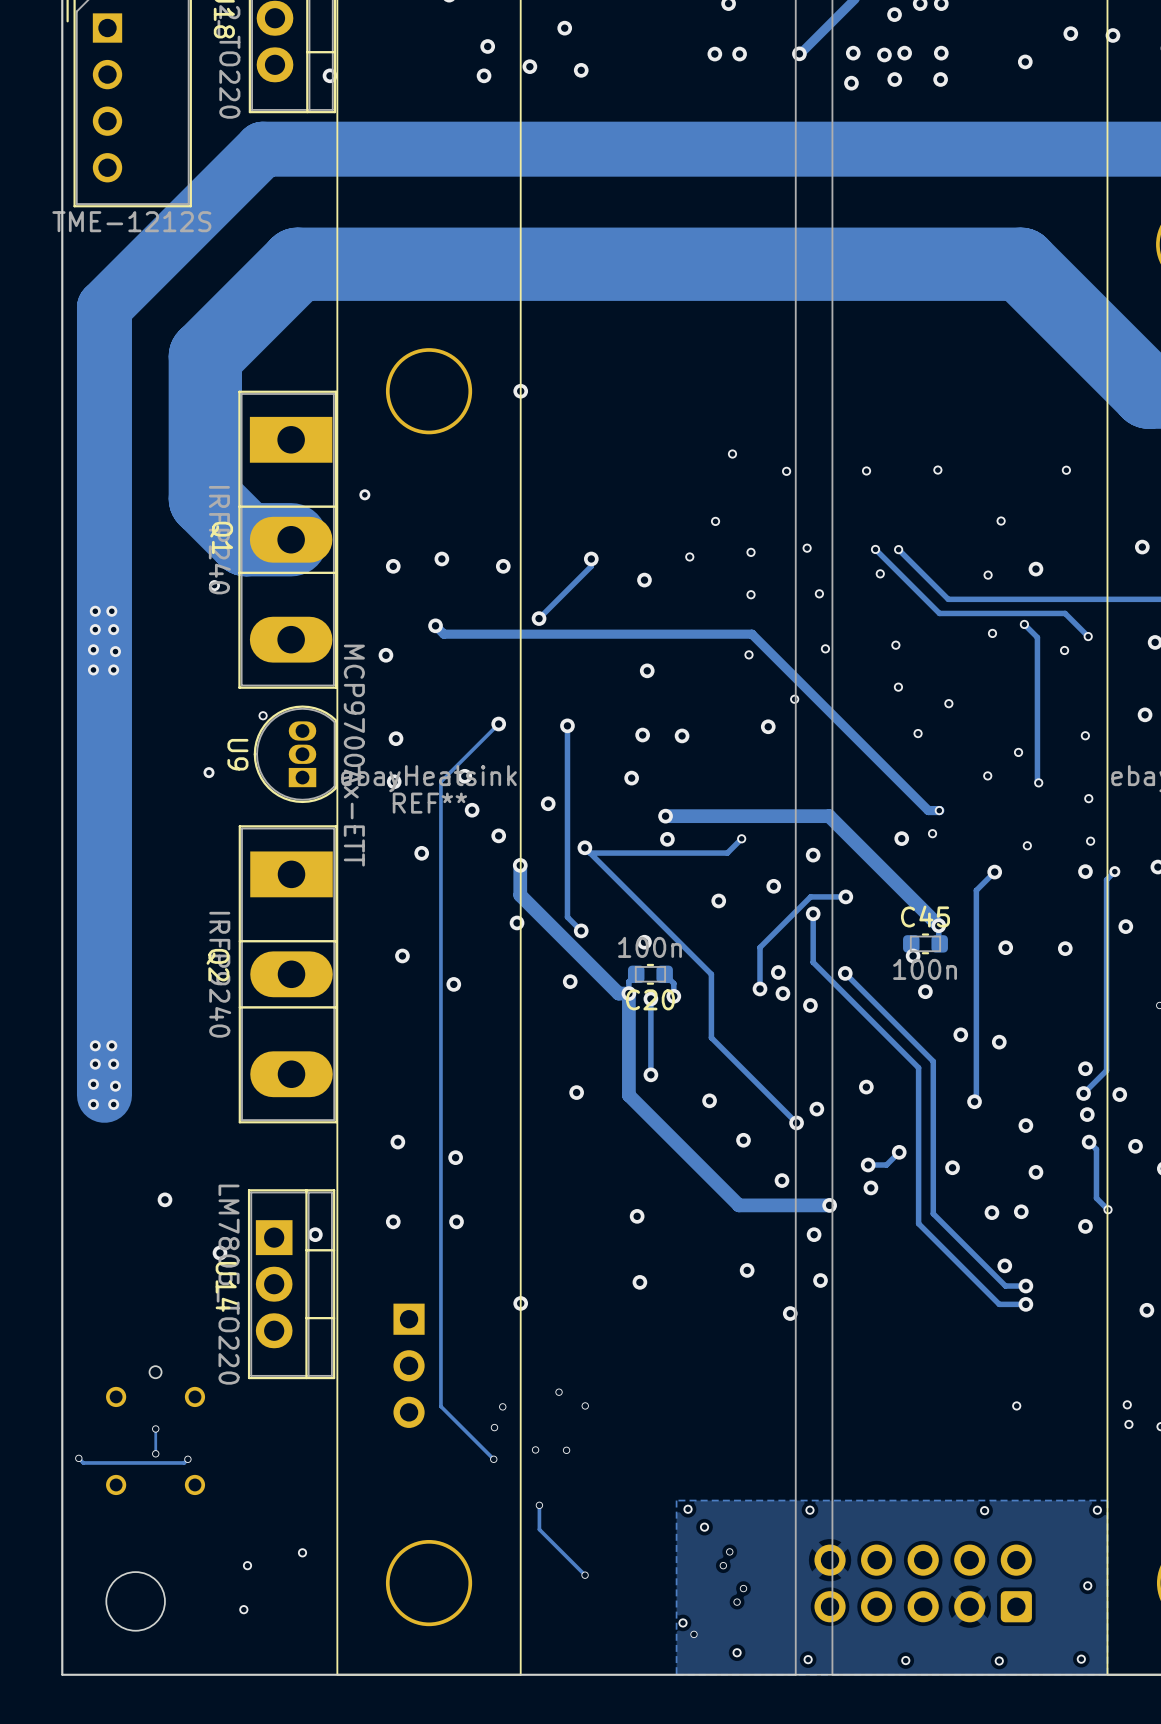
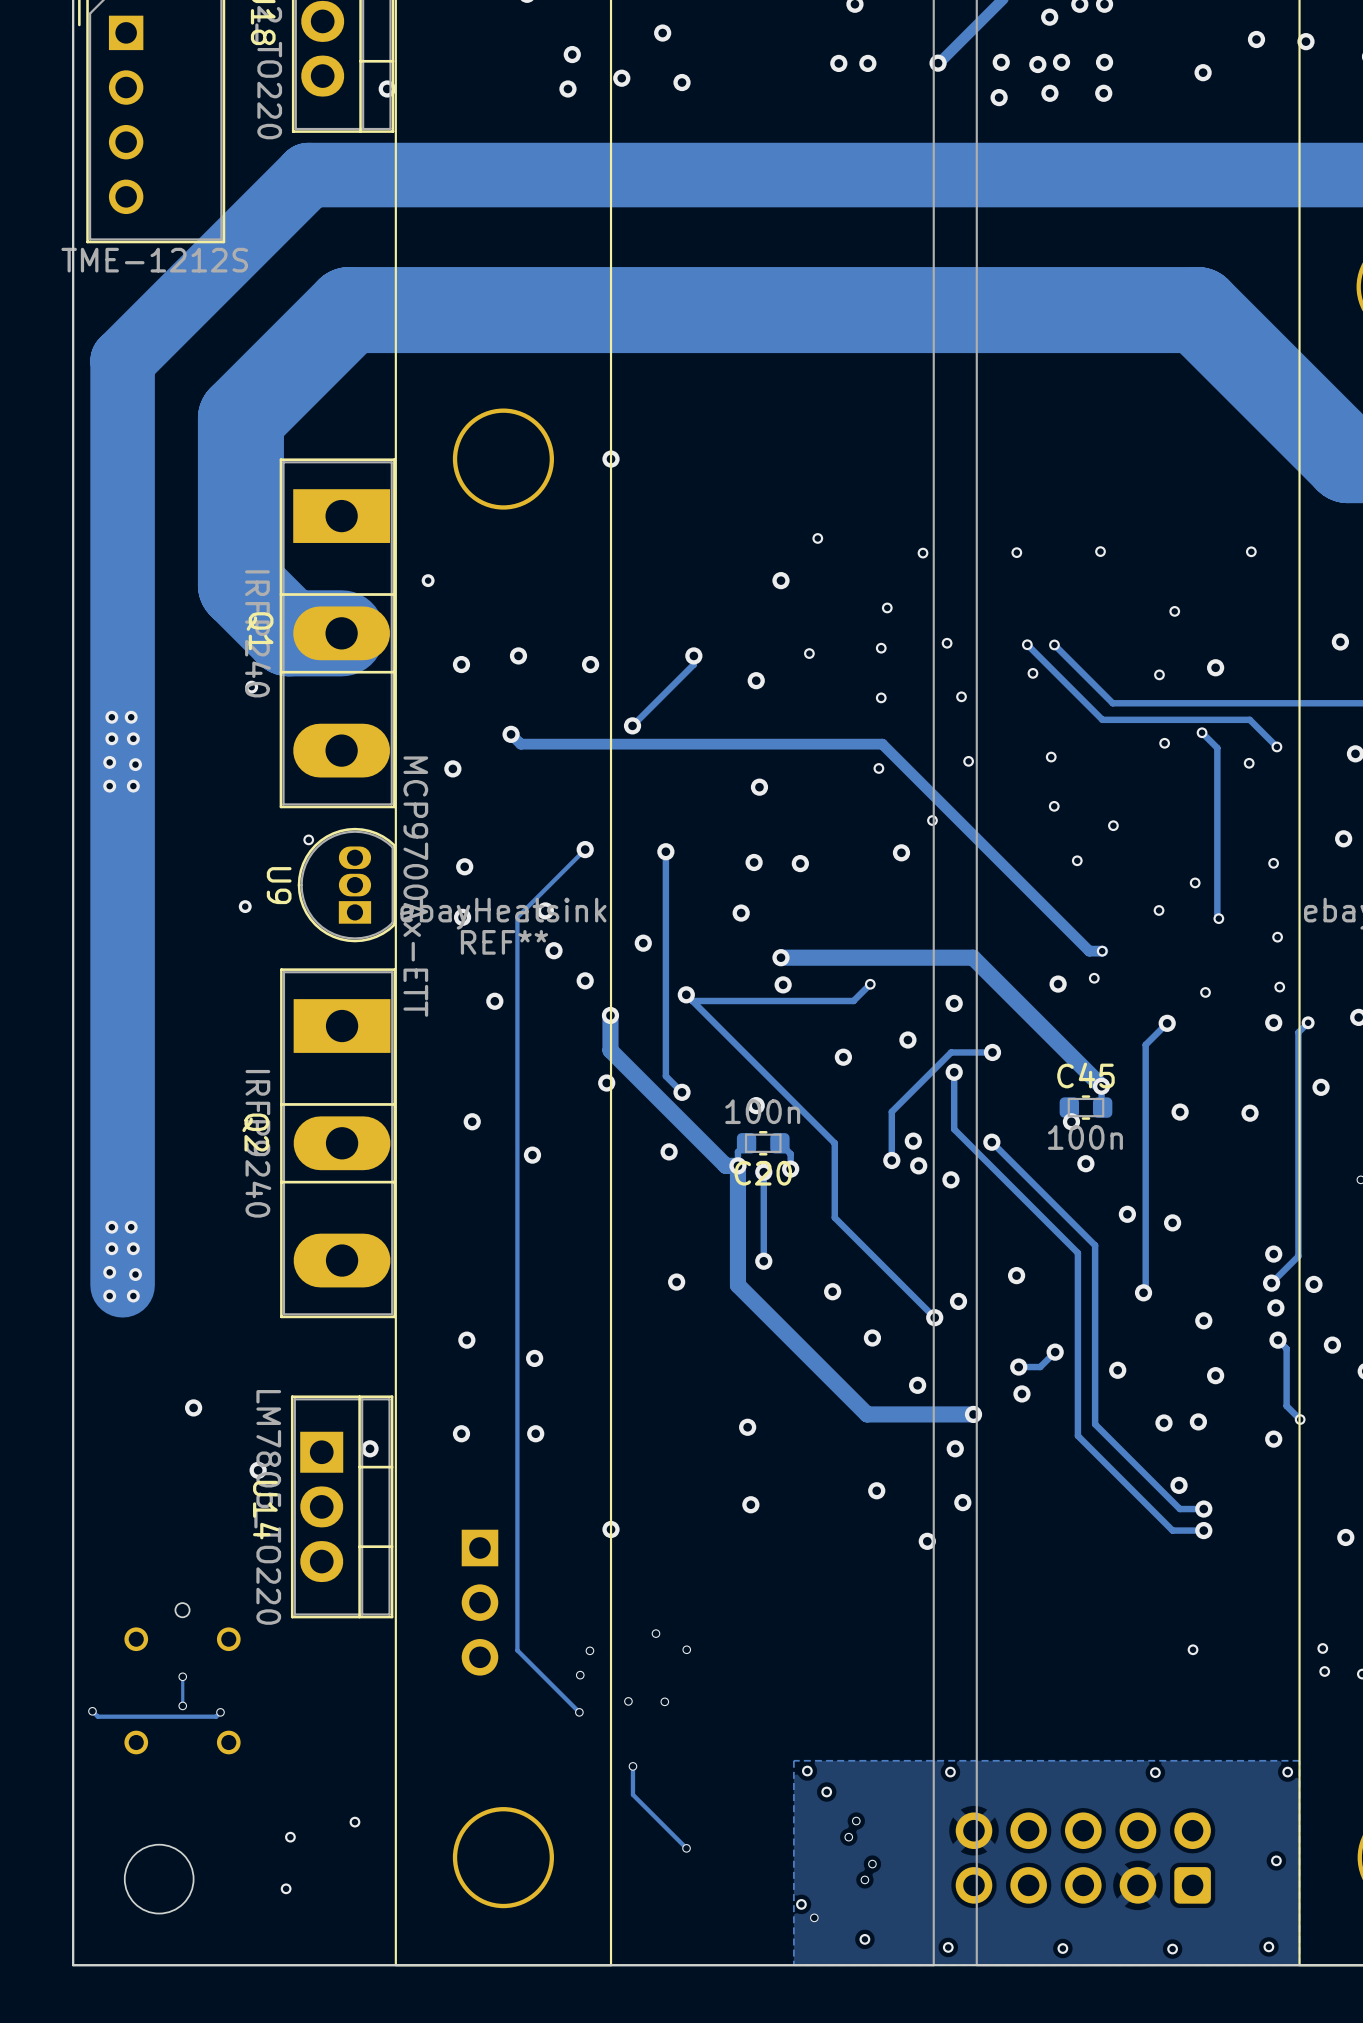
via: (732, 454) -> none
via: none -> (817, 538)
via: none -> (780, 580)
via: none -> (887, 607)
via: (715, 521) -> none

